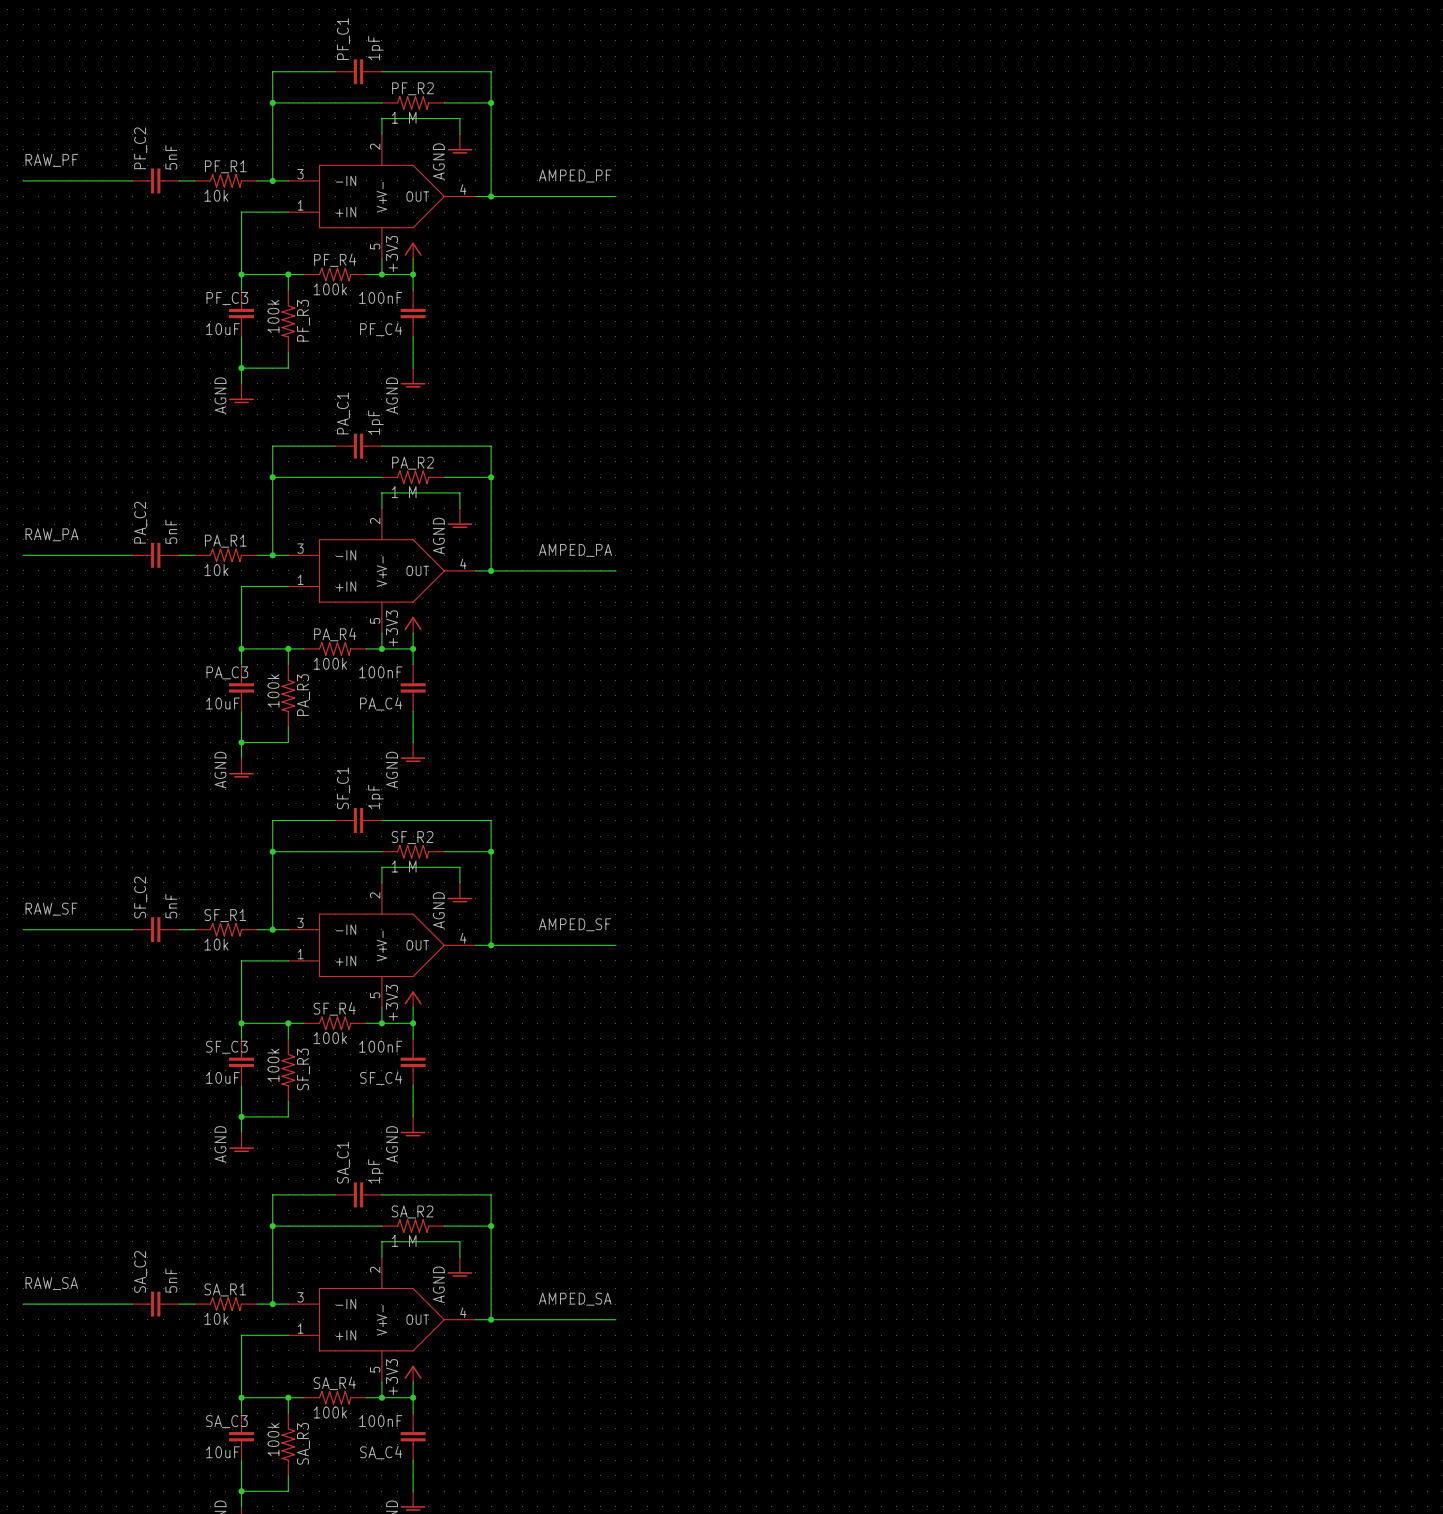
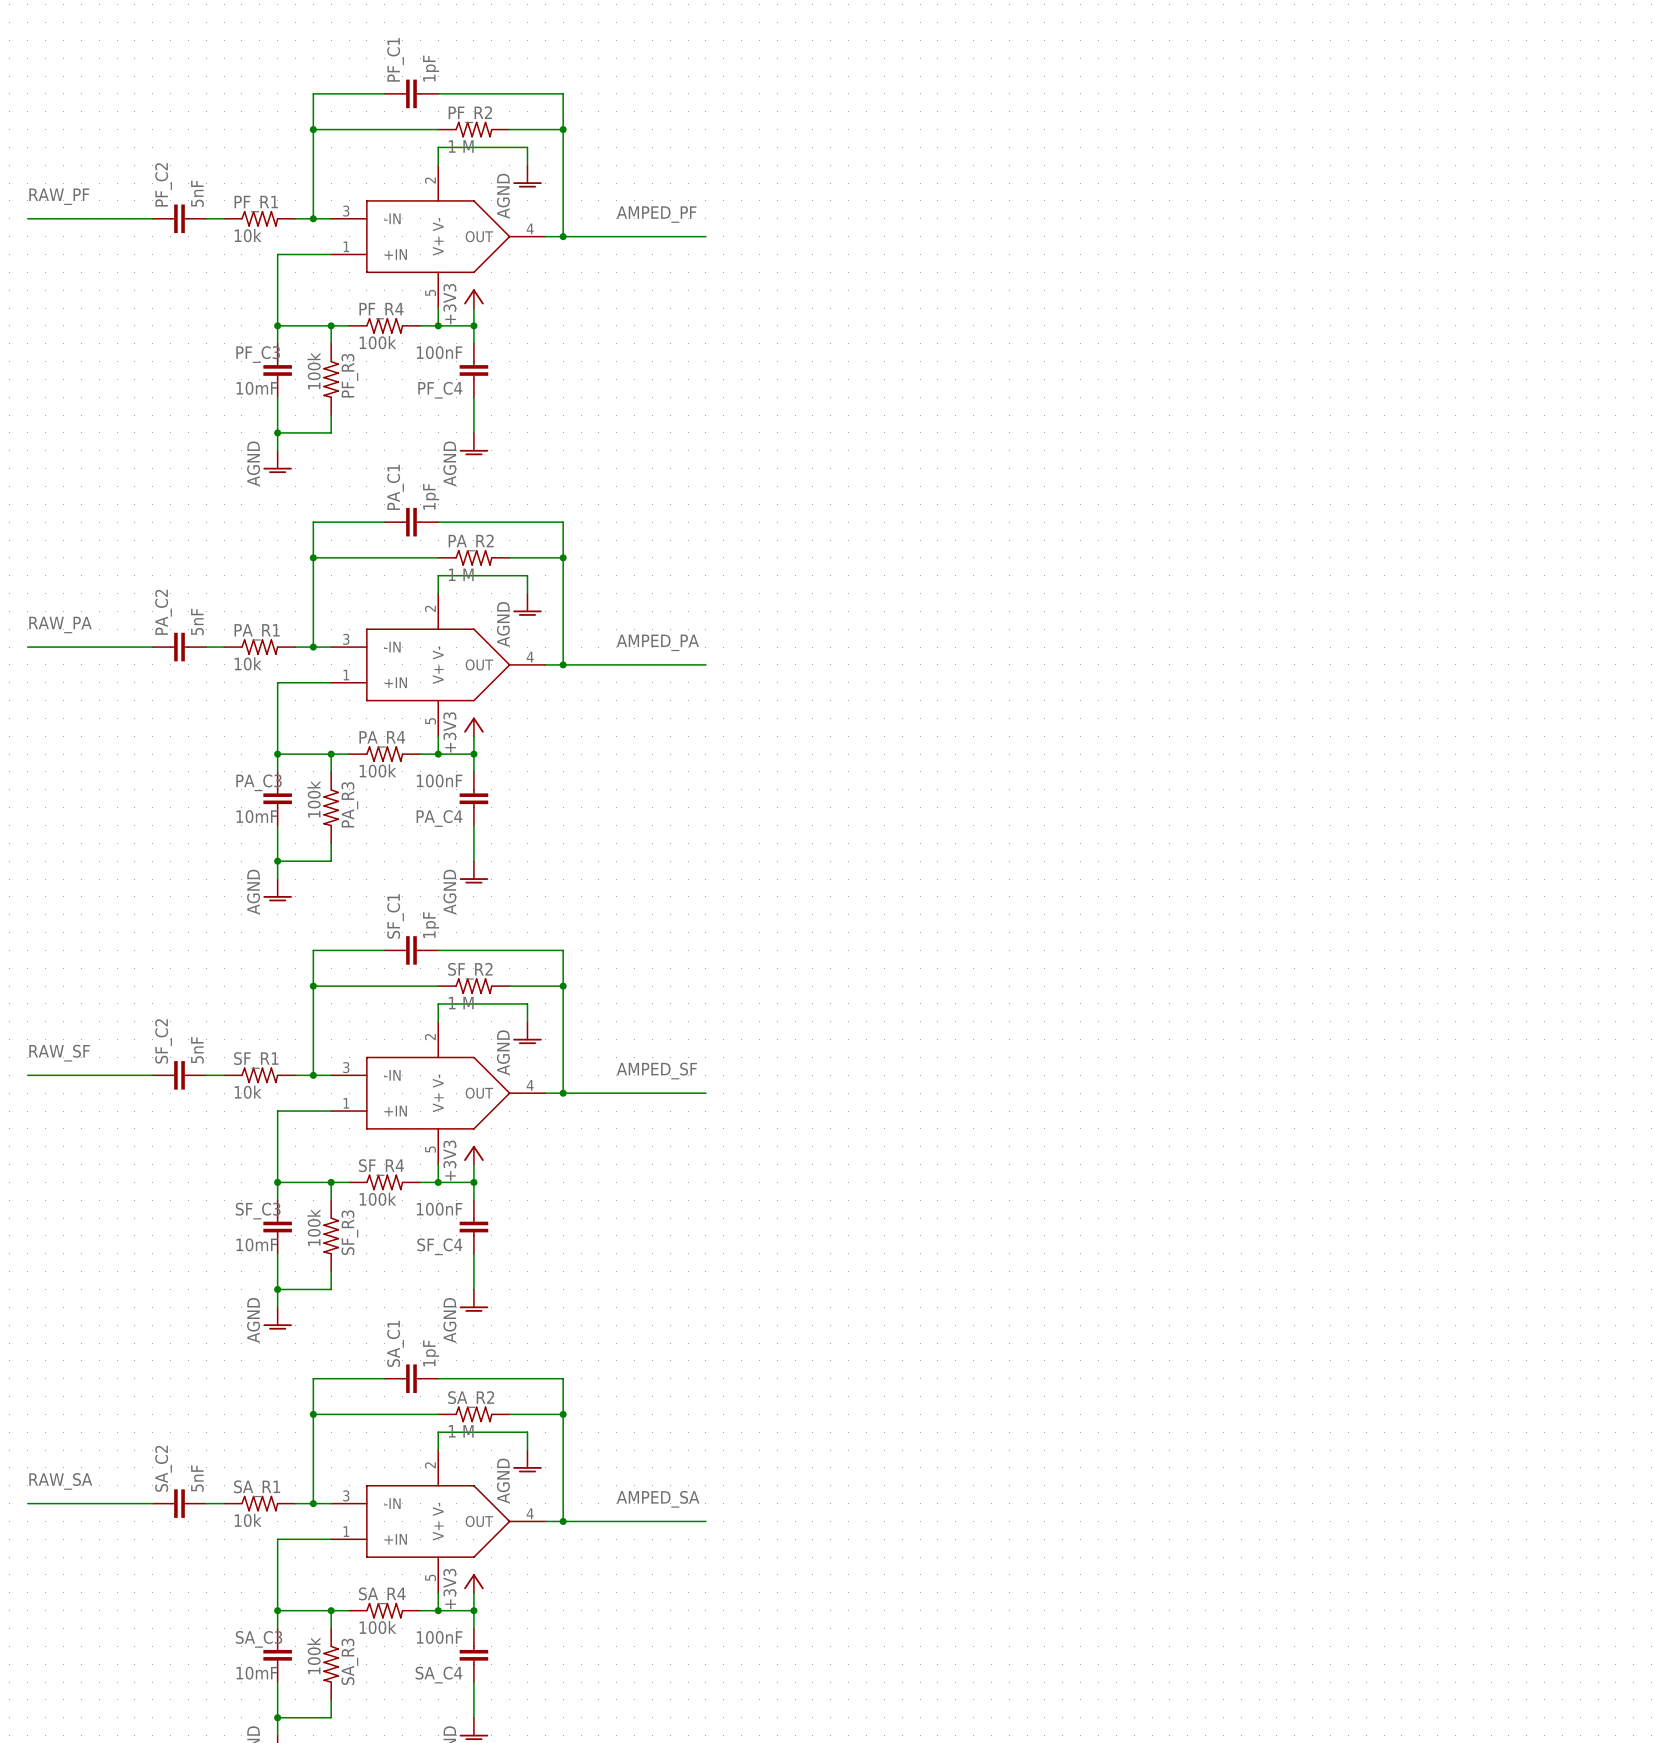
PF_C3 value: 10uF (222, 329) -> 10mF (256, 388)
PA_C3 value: 10uF (222, 703) -> 10mF (256, 816)
SF_C3 value: 10uF (222, 1077) -> 10mF (256, 1244)
SA_C3 value: 10uF (222, 1452) -> 10mF (256, 1673)

